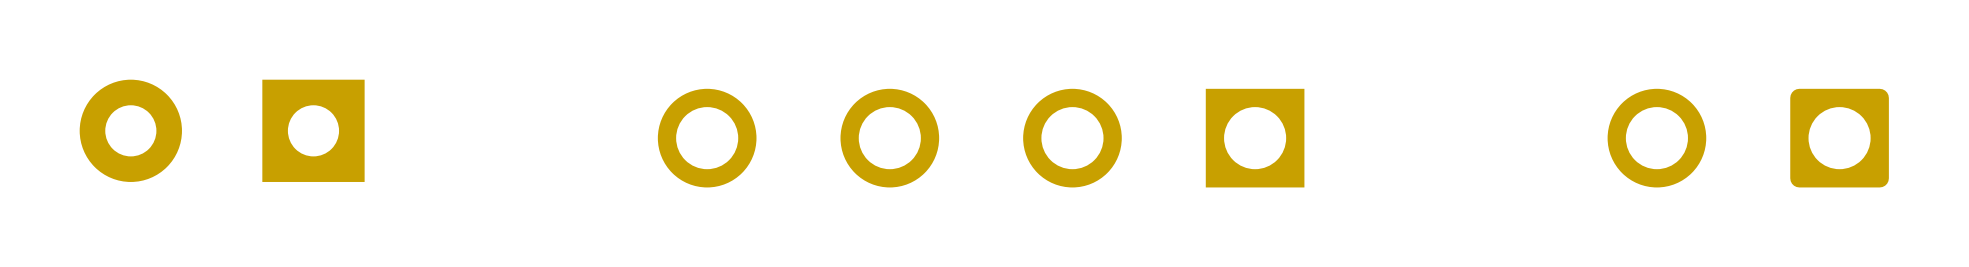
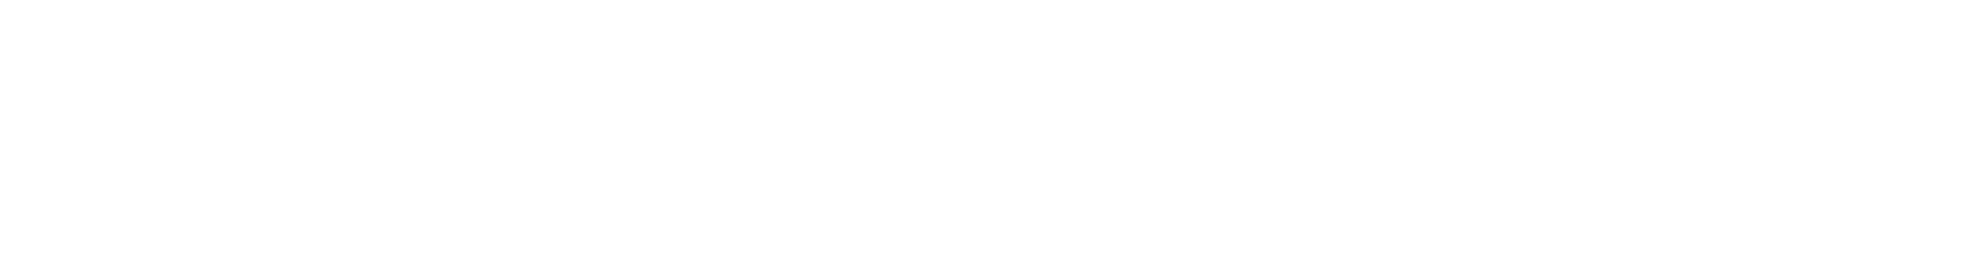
part: (222, 130) -> none
part: (981, 138) -> none
part: (1748, 138) -> none

